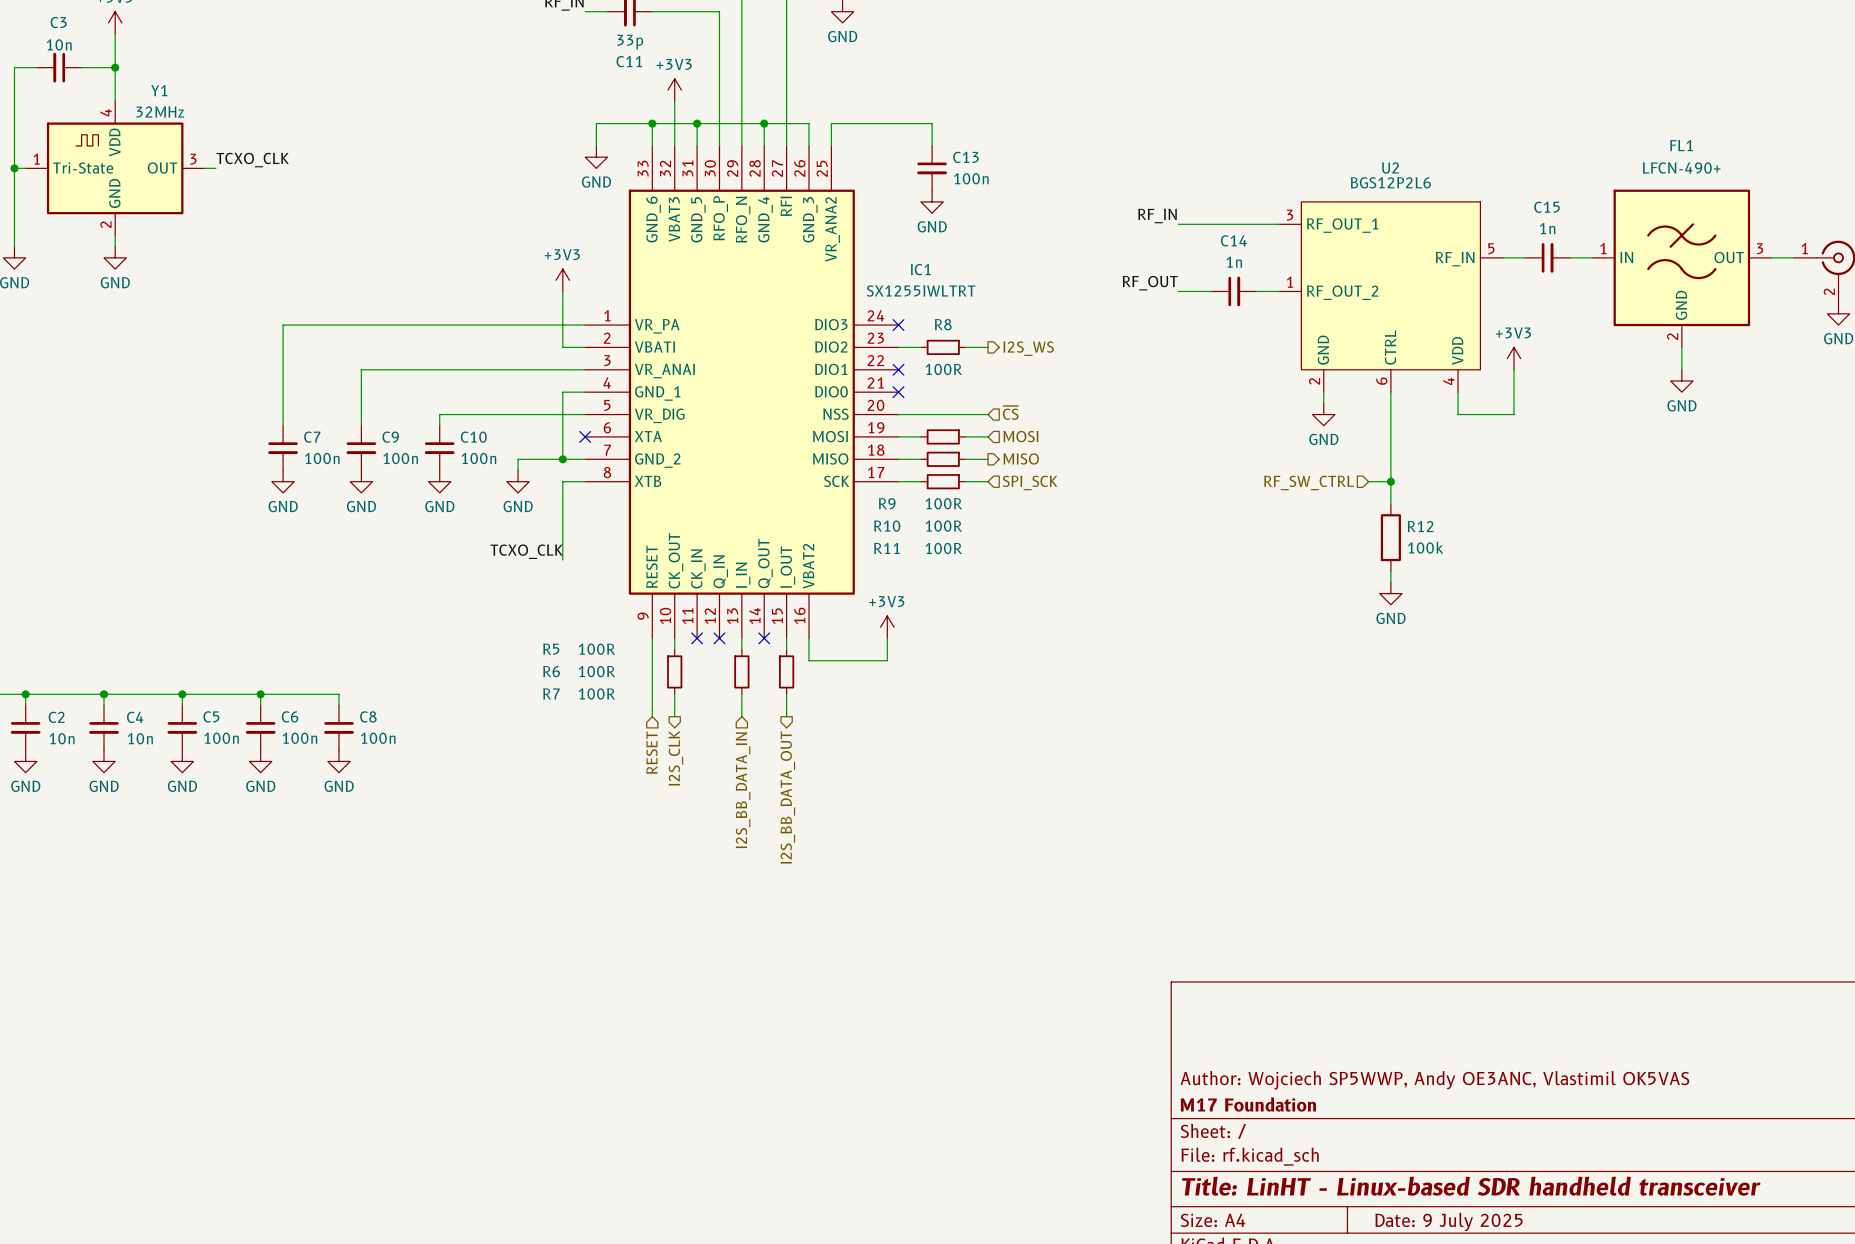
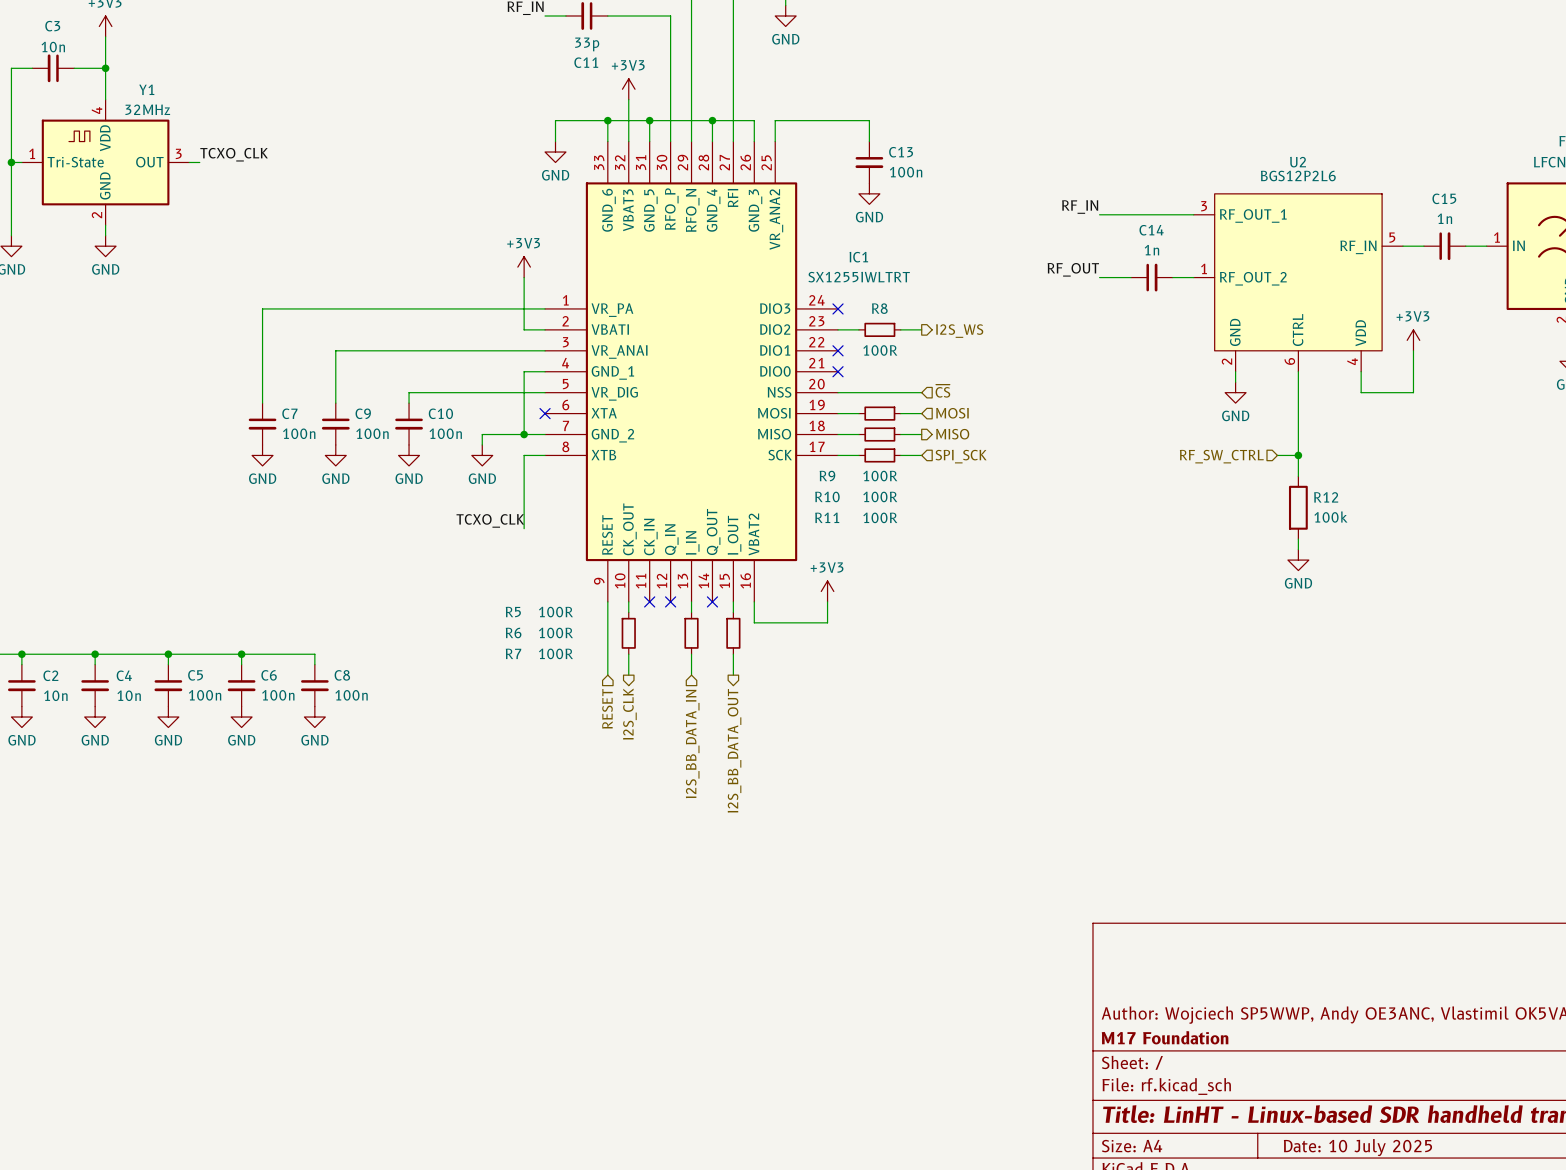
title block: Date: 9 July 2025 (1448, 1221) -> Date: 10 July 2025 (1357, 1147)

